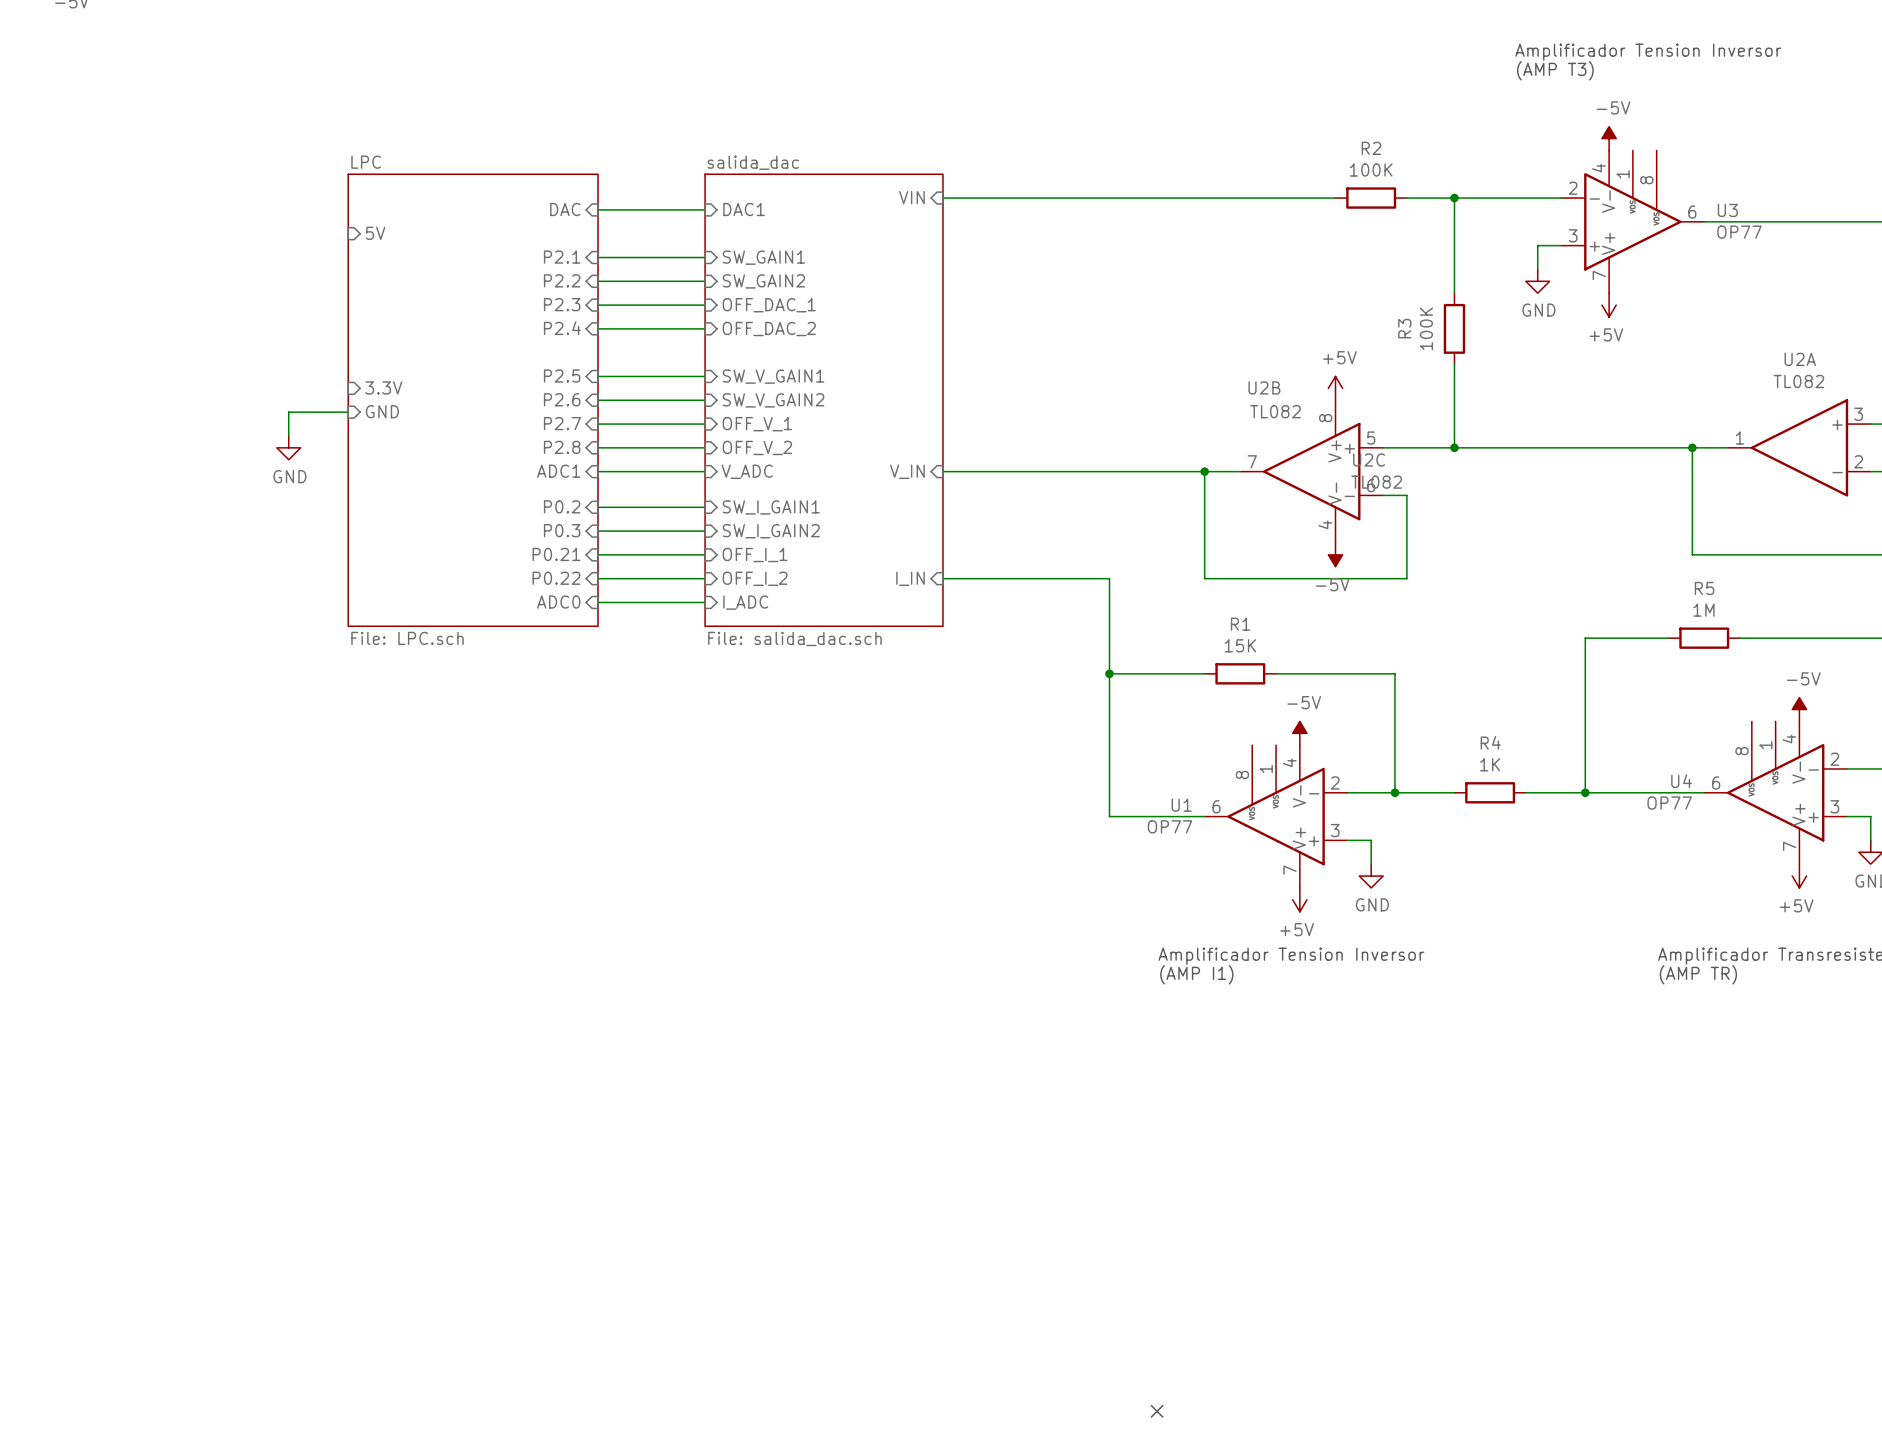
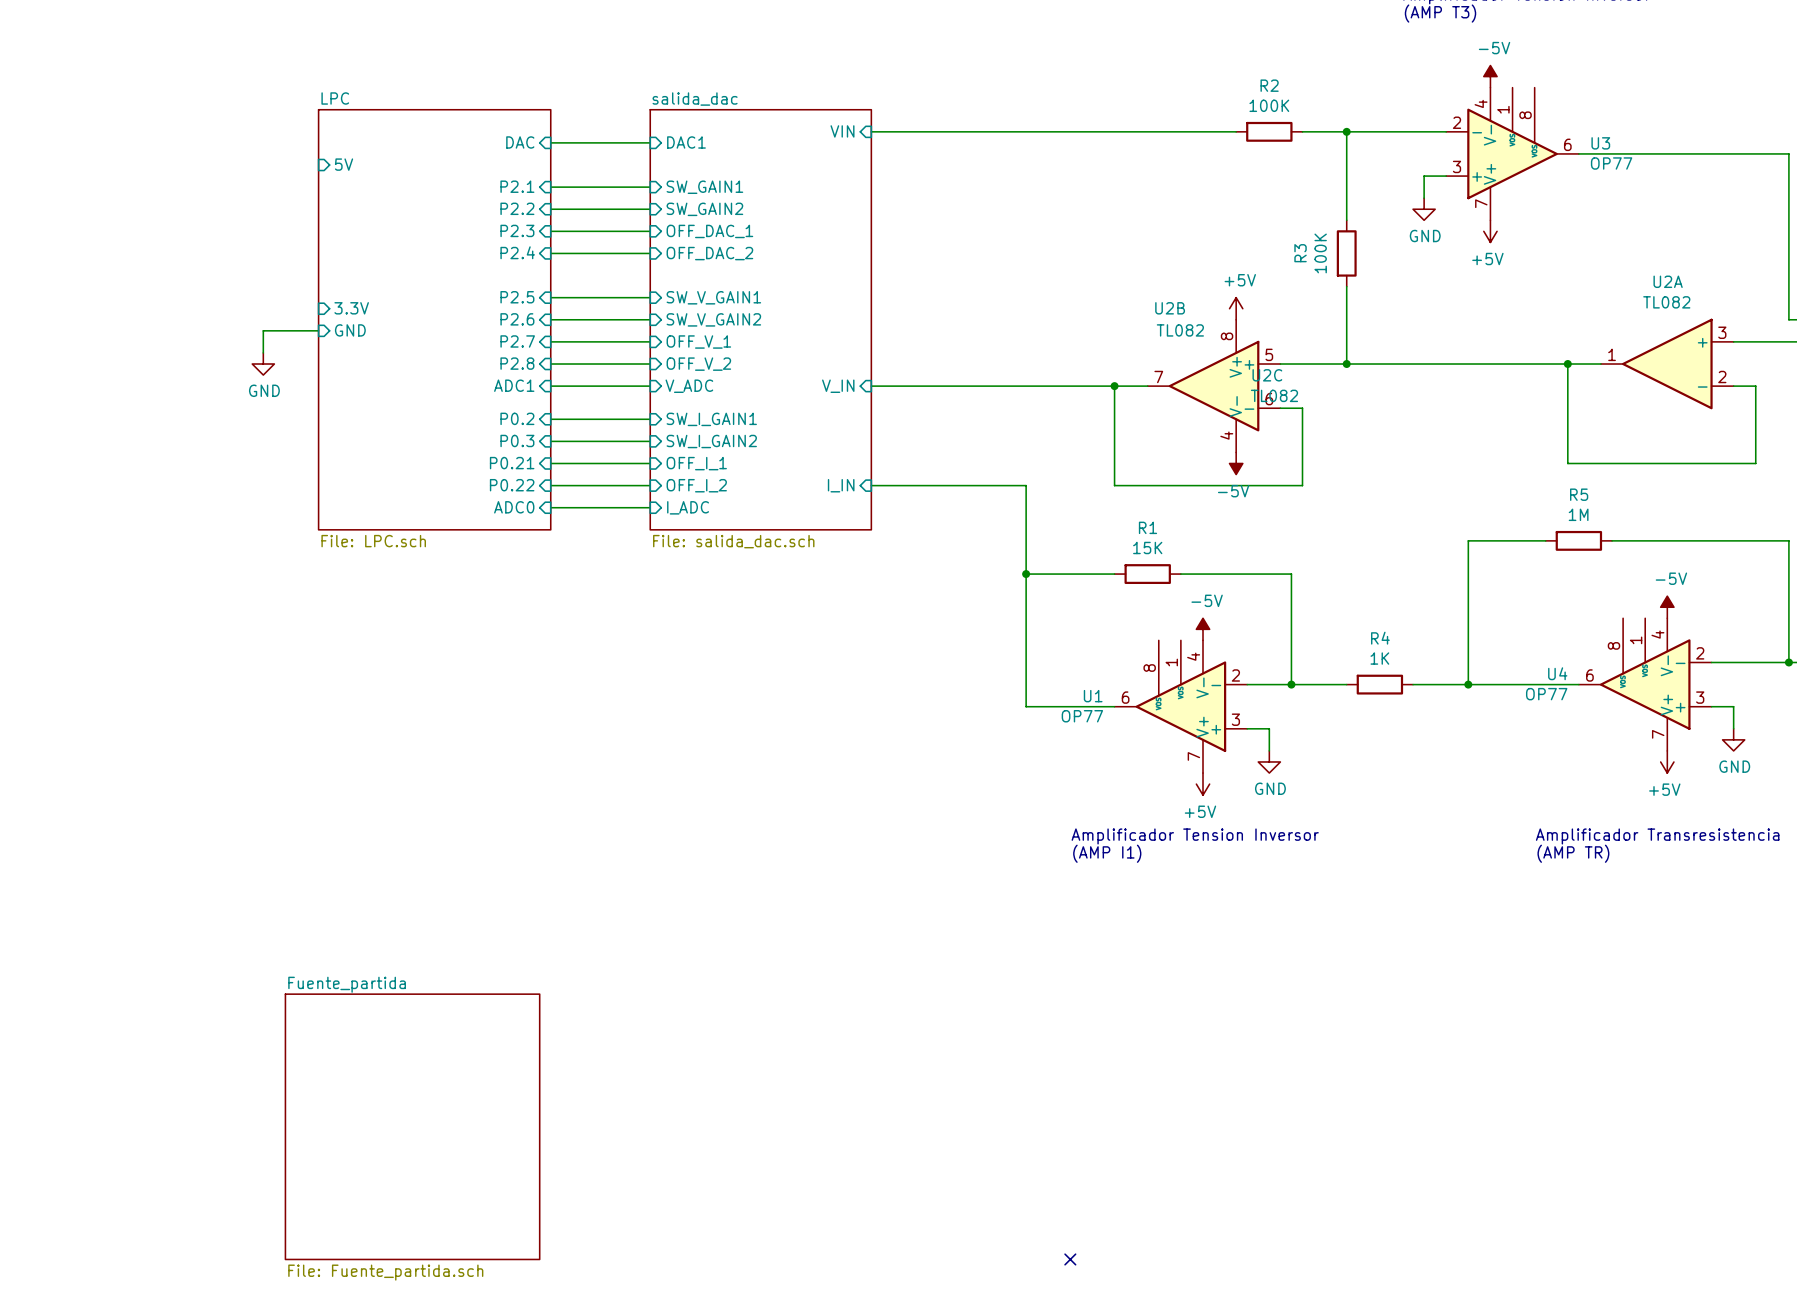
sheet Fuente_partida: none -> File: Fuente_partida.sch (412, 1126)

